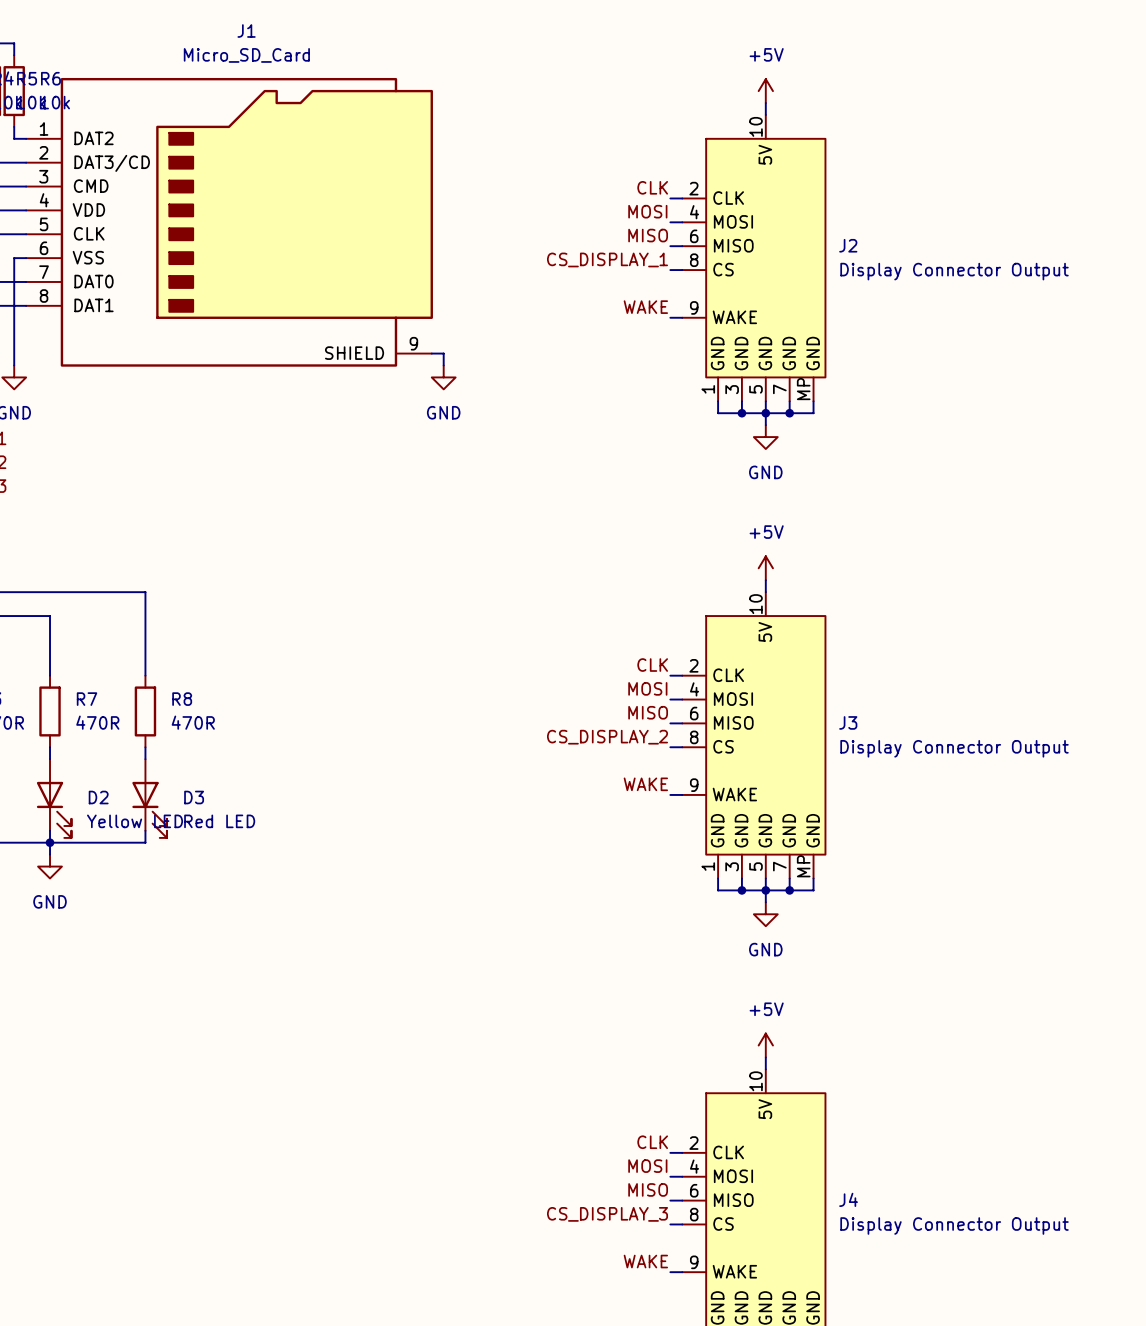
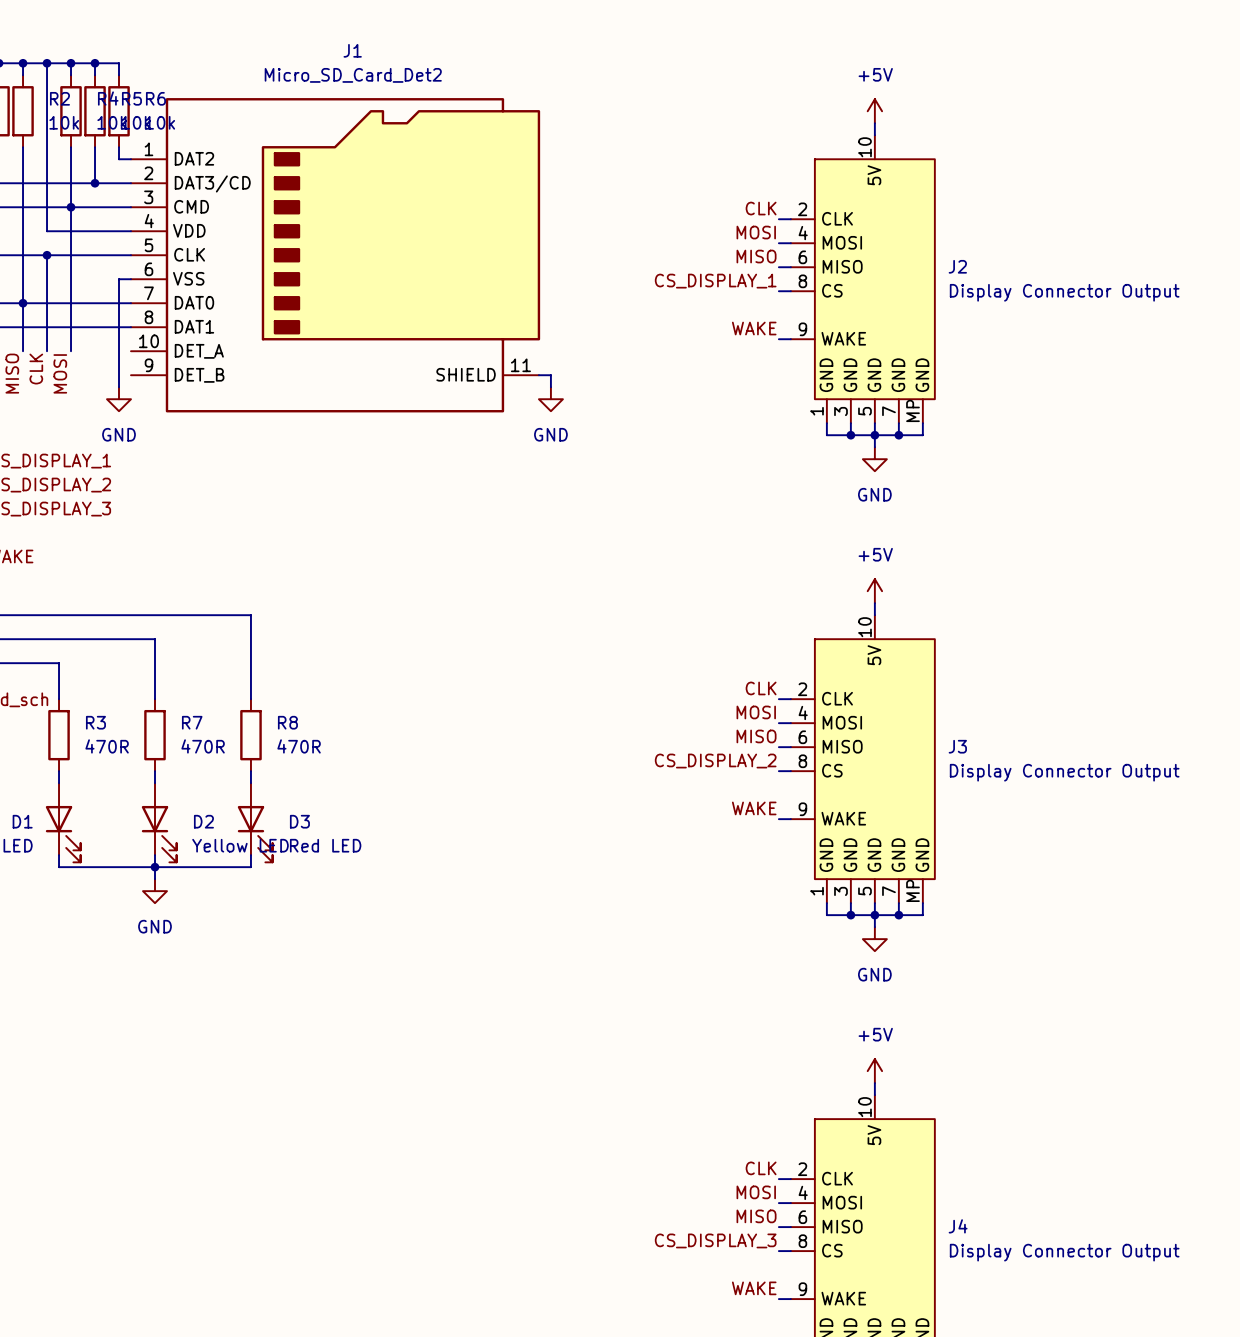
J1 value: Micro_SD_Card (246, 55) -> Micro_SD_Card_Det2 (353, 75)
J1 symbol: [26, 77, 433, 367] -> [131, 98, 541, 413]

